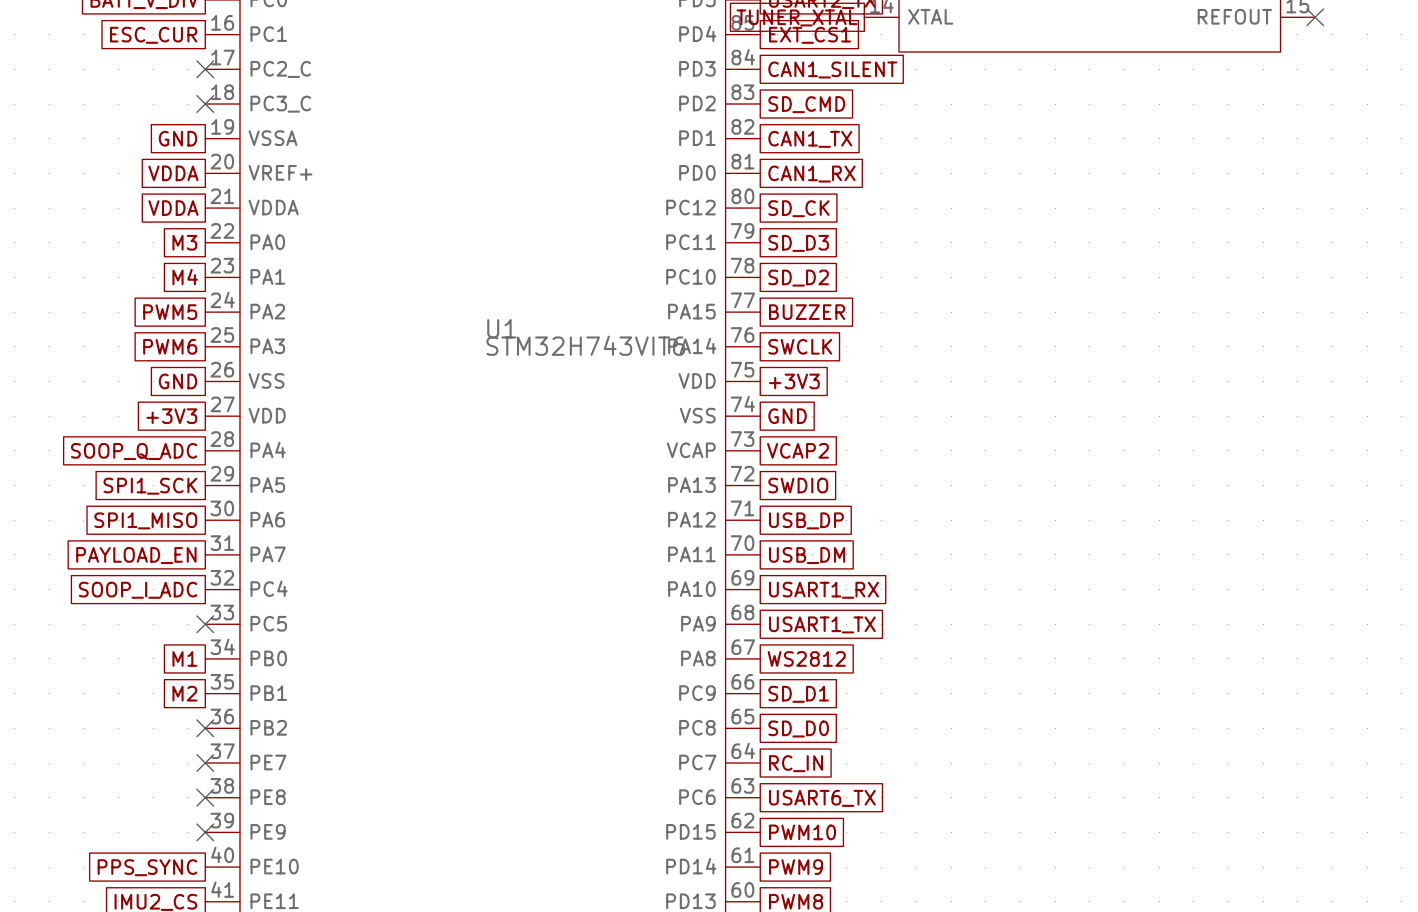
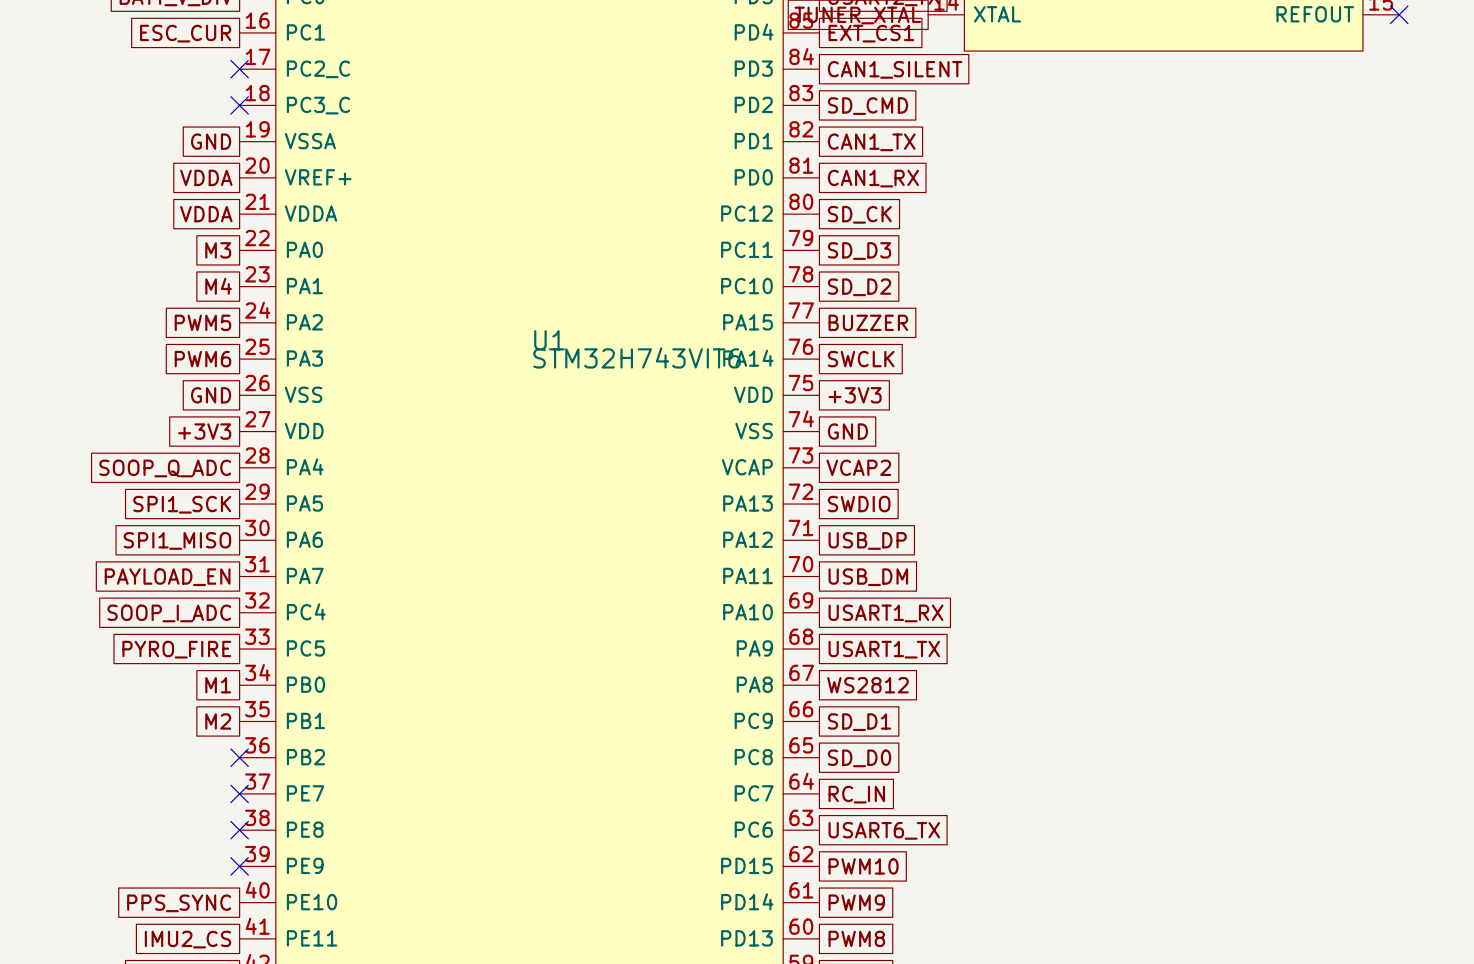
global label: none -> PYRO_FIRE (176, 649)
no-connect mark: (205, 624) -> none

